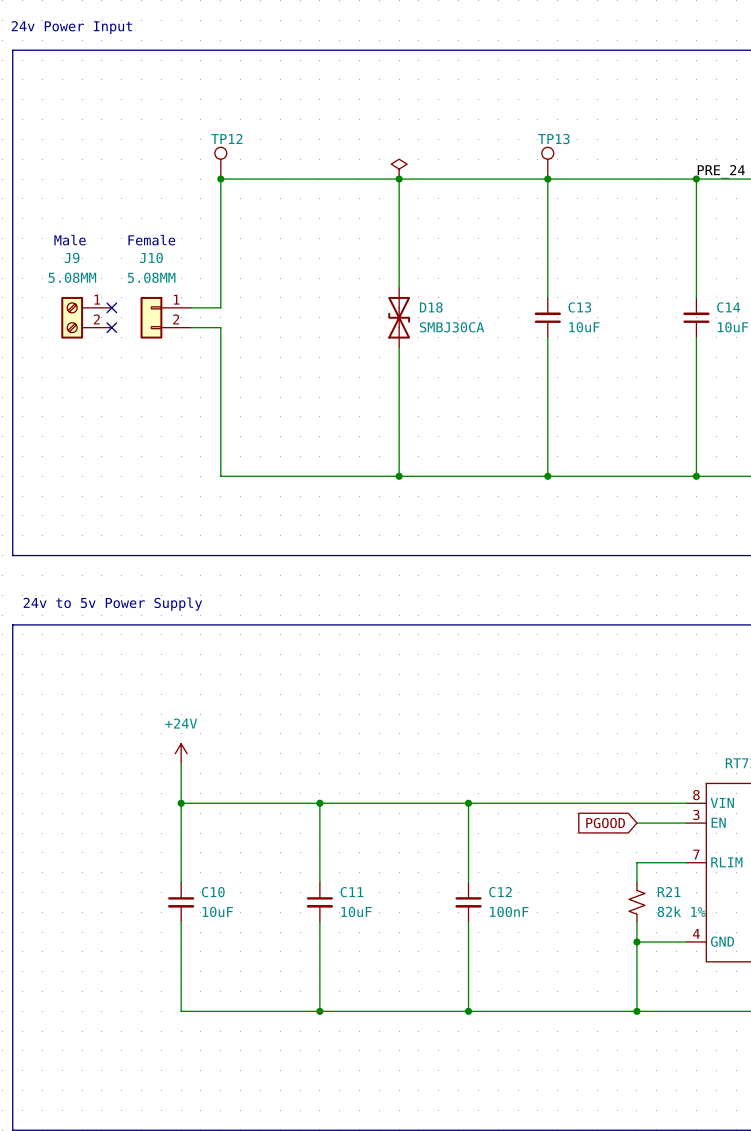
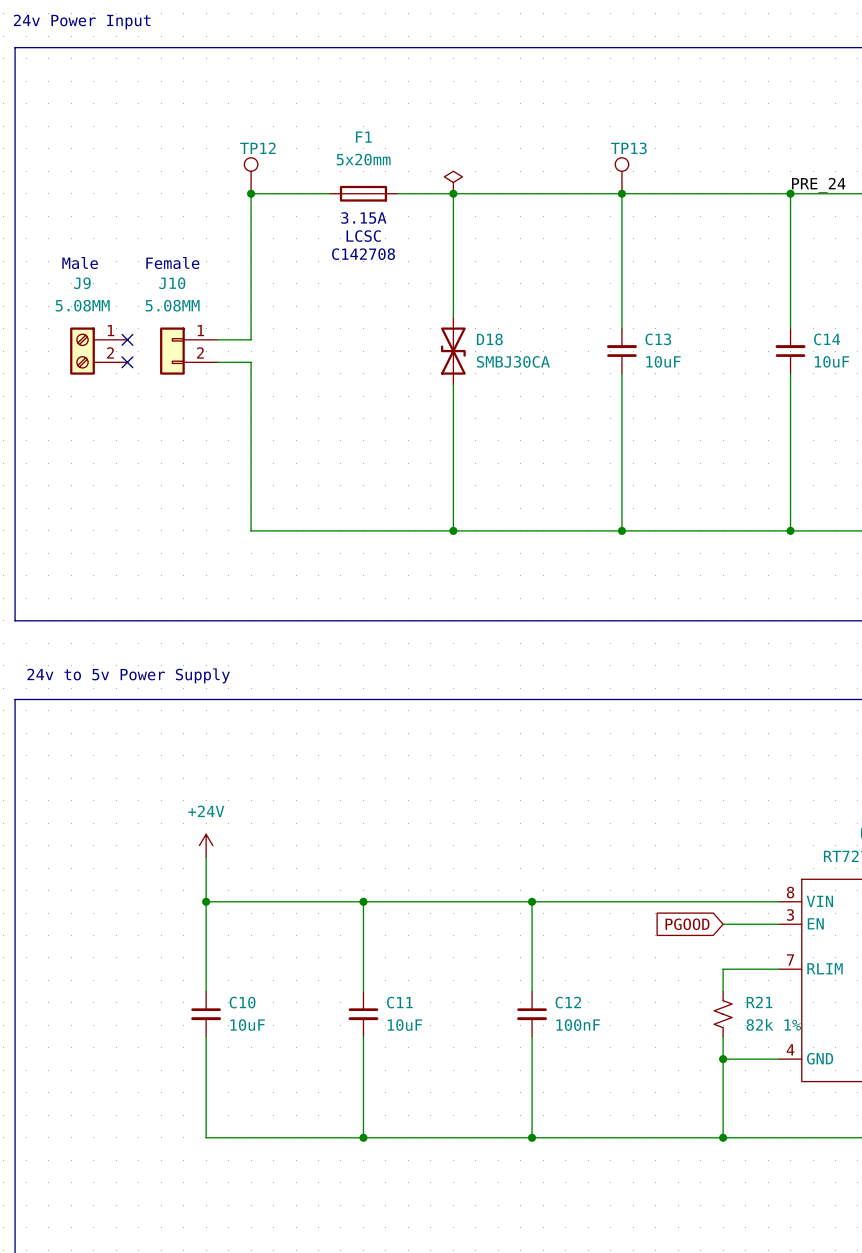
F1: none -> 5x20mm (363, 193)
text: none -> 3.15A (363, 217)
text: none -> LCSC (363, 236)
text: none -> C142708 (363, 254)

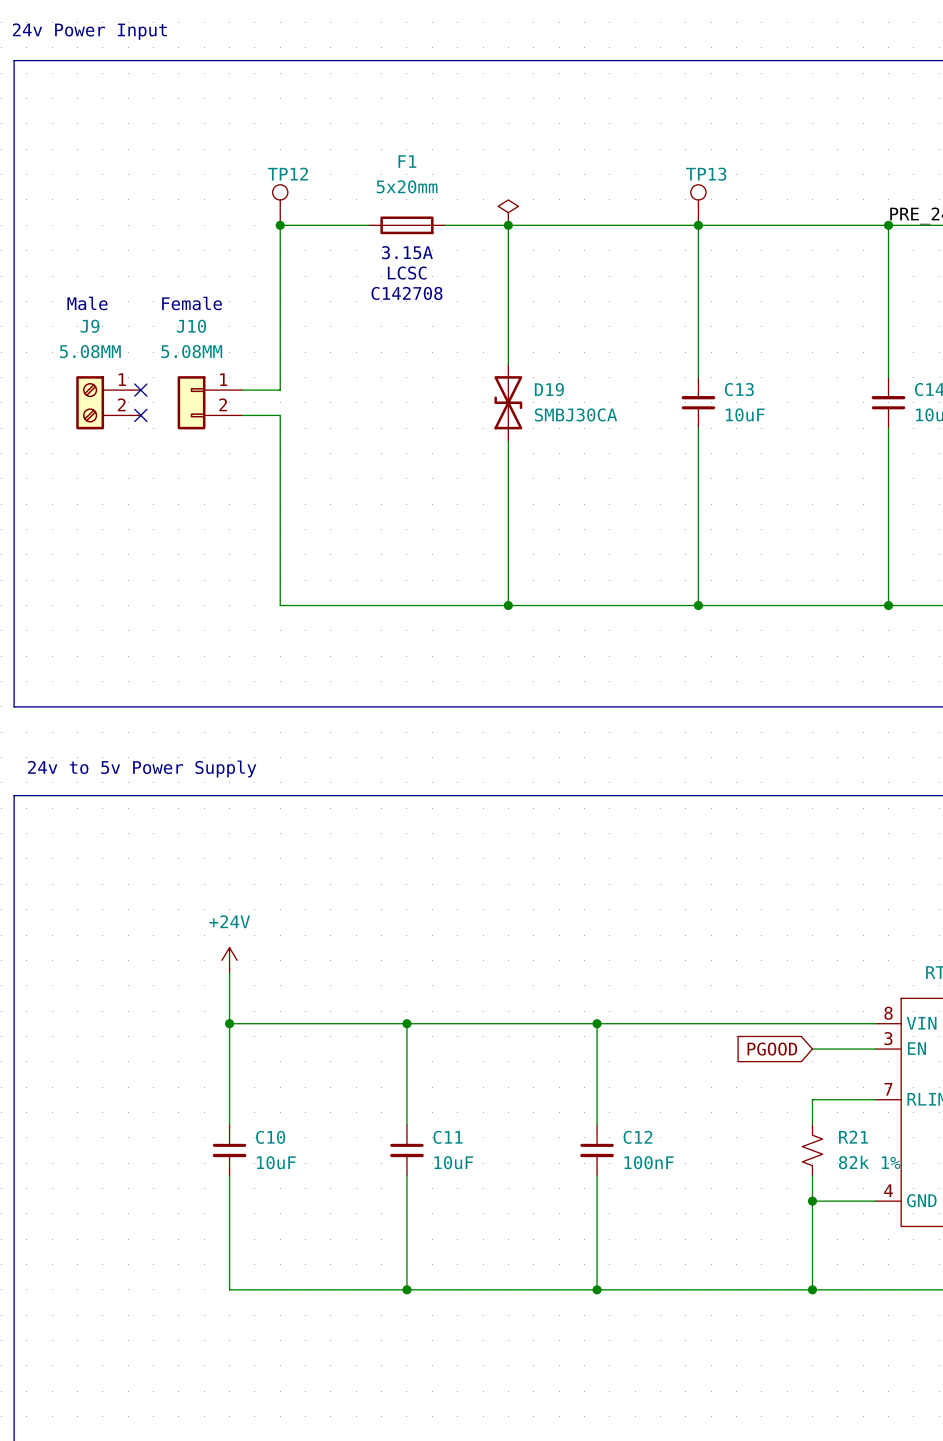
D18 name: D18 (489, 339) -> D19 (549, 389)

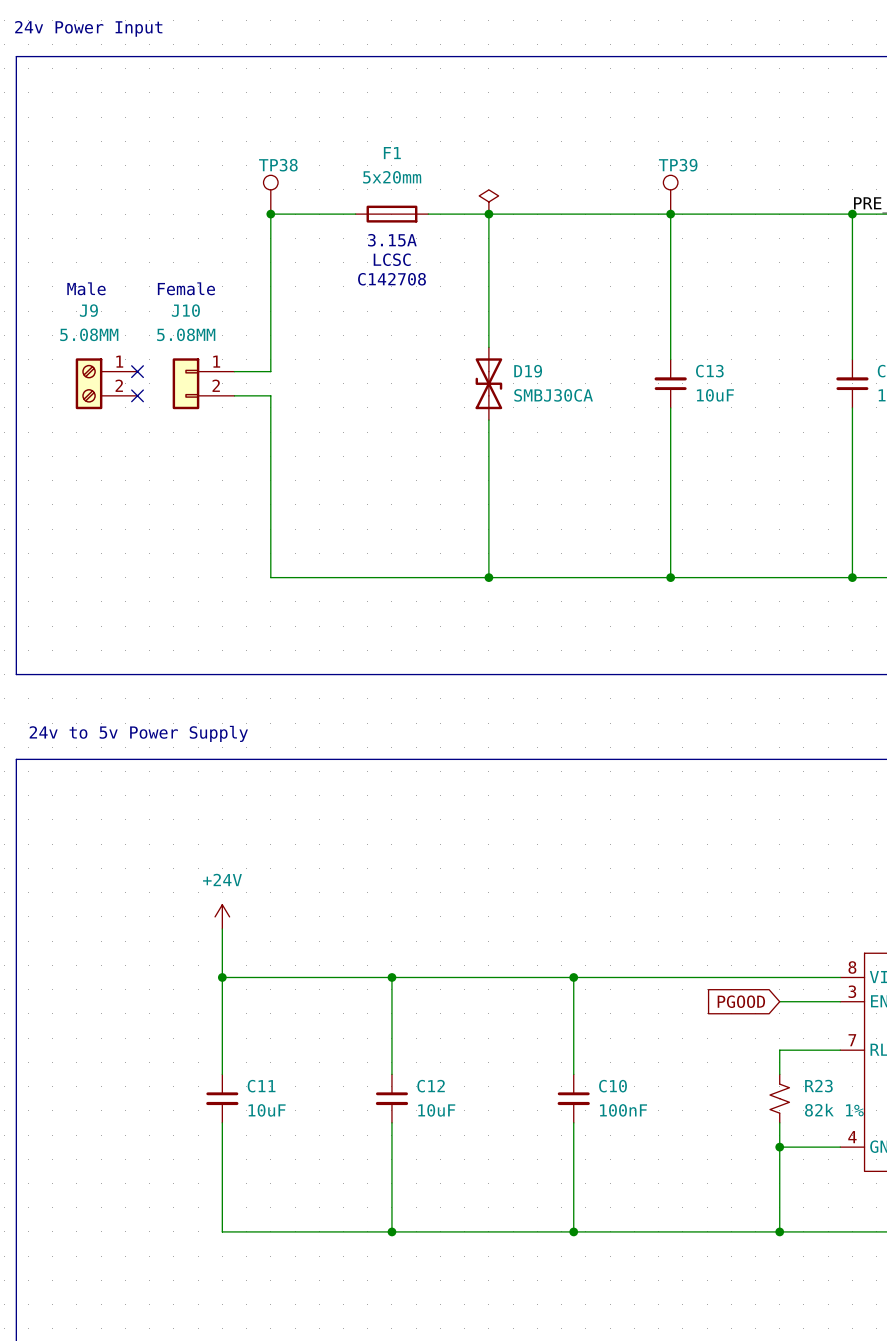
TP12 name: TP12 (287, 174) -> TP38 (278, 165)
TP13 name: TP13 (706, 174) -> TP39 (678, 165)
C10 name: C10 (270, 1137) -> C11 (261, 1086)
C11 name: C11 (448, 1137) -> C12 (431, 1086)
C12 name: C12 (637, 1137) -> C10 (613, 1086)
R21 name: R21 (853, 1137) -> R23 (818, 1086)

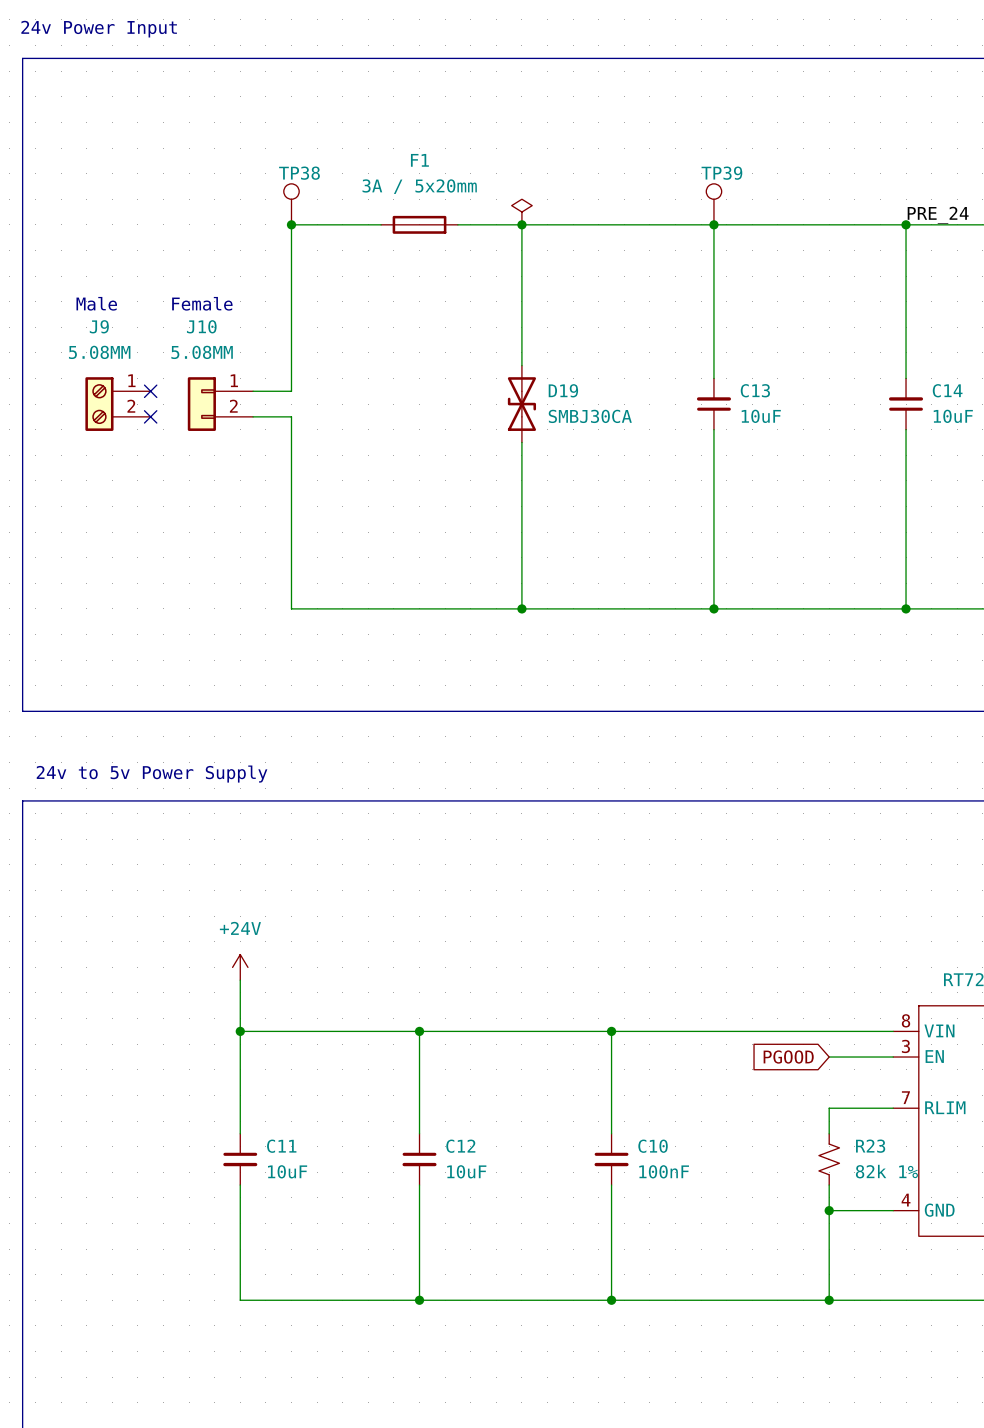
F1 value: 5x20mm (392, 177) -> 3A / 5x20mm (419, 186)
text: 3.15A (392, 240) -> none
text: LCSC (392, 259) -> none
text: C142708 (392, 279) -> none

